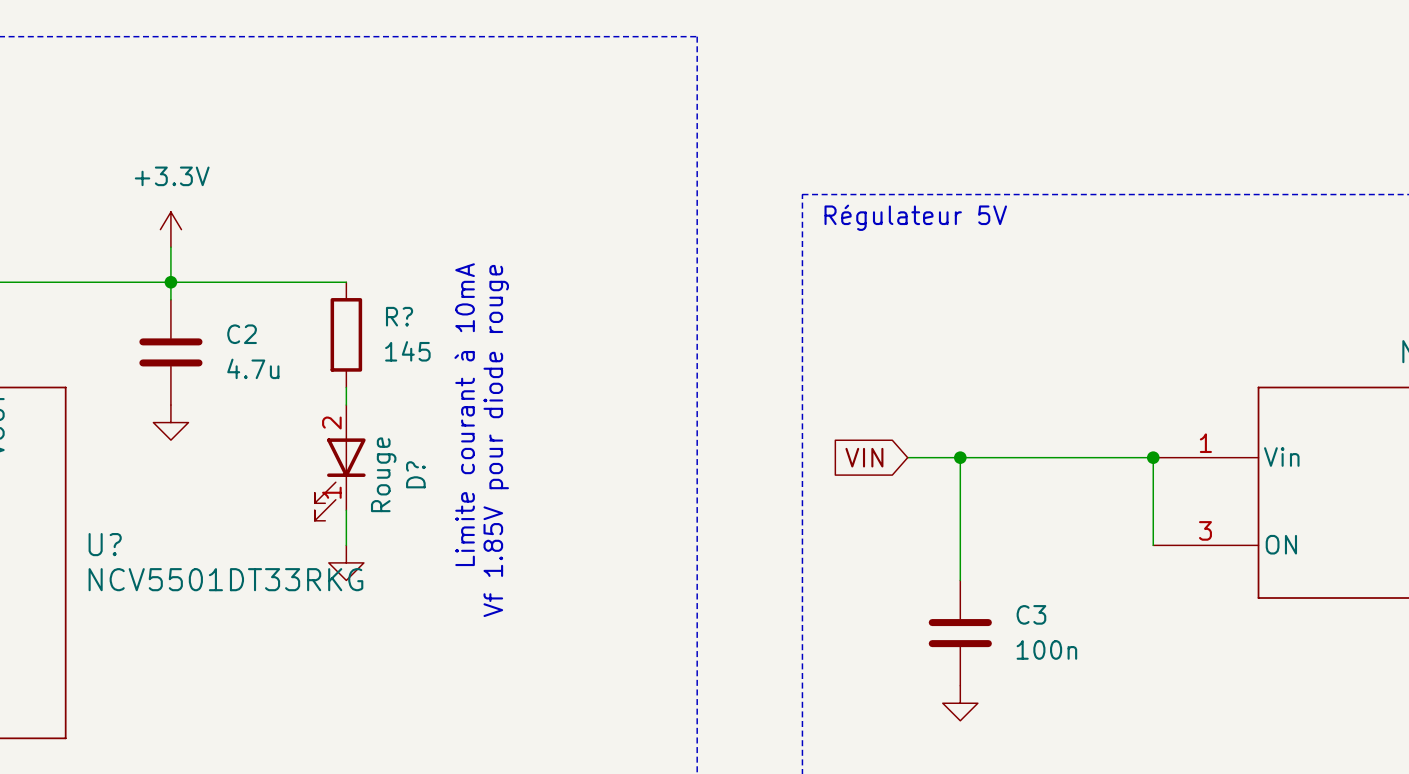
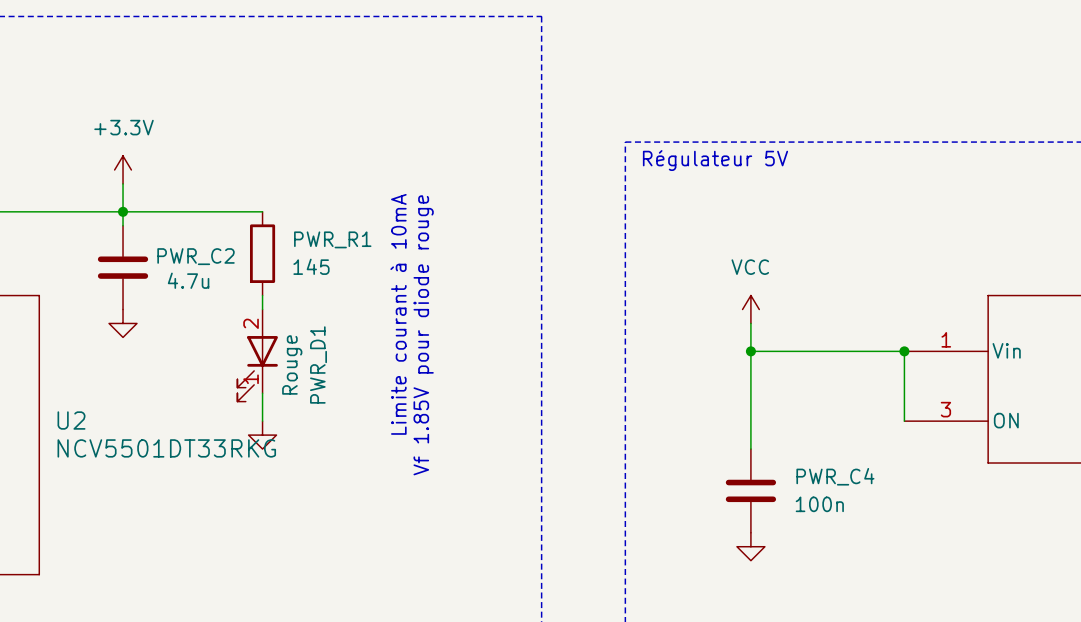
R? name: R? (399, 316) -> PWR_R1 (332, 239)
C2 name: C2 (242, 334) -> PWR_C2 (196, 256)
power symbol: none -> VCC (750, 309)
text position: Limite courant à 10mA (464, 414) -> Limite courant à 10mA (398, 314)
text position: Vf 1.85V pour diode rouge (496, 440) -> Vf 1.85V pour diode rouge (423, 335)
global label: VIN (864, 457) -> none
wire: (907, 457) (960, 457) -> (750, 323) (750, 351)
D? name: D? (415, 474) -> PWR_D1 (318, 364)
U? name: U? (105, 544) -> U2 (71, 420)
C3 name: C3 (1031, 614) -> PWR_C4 (835, 476)

